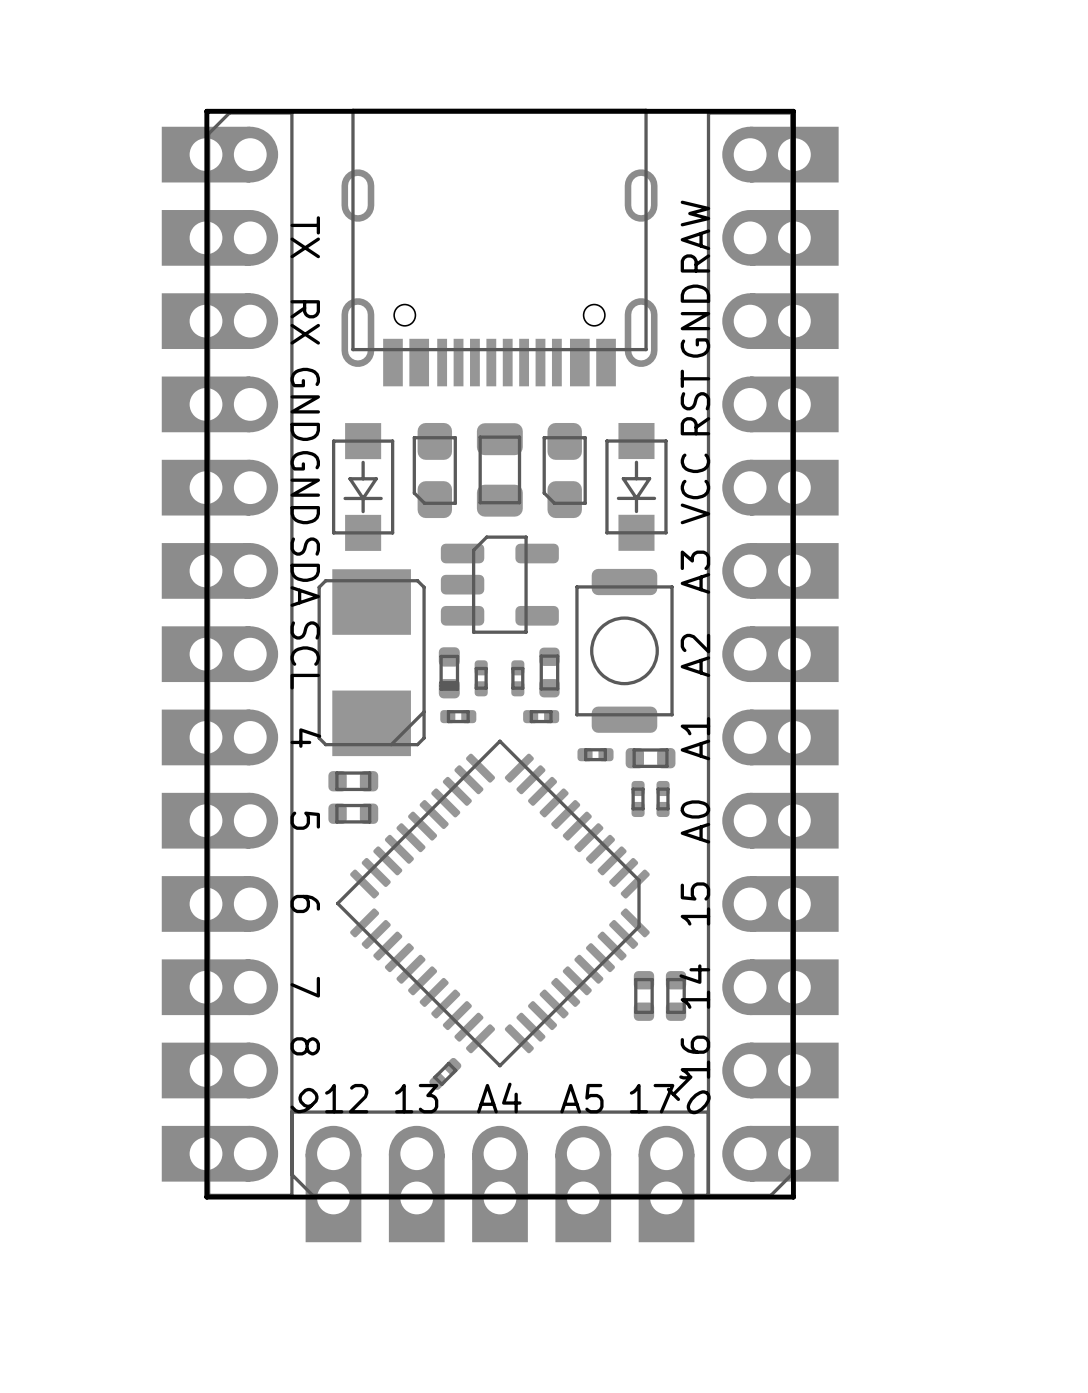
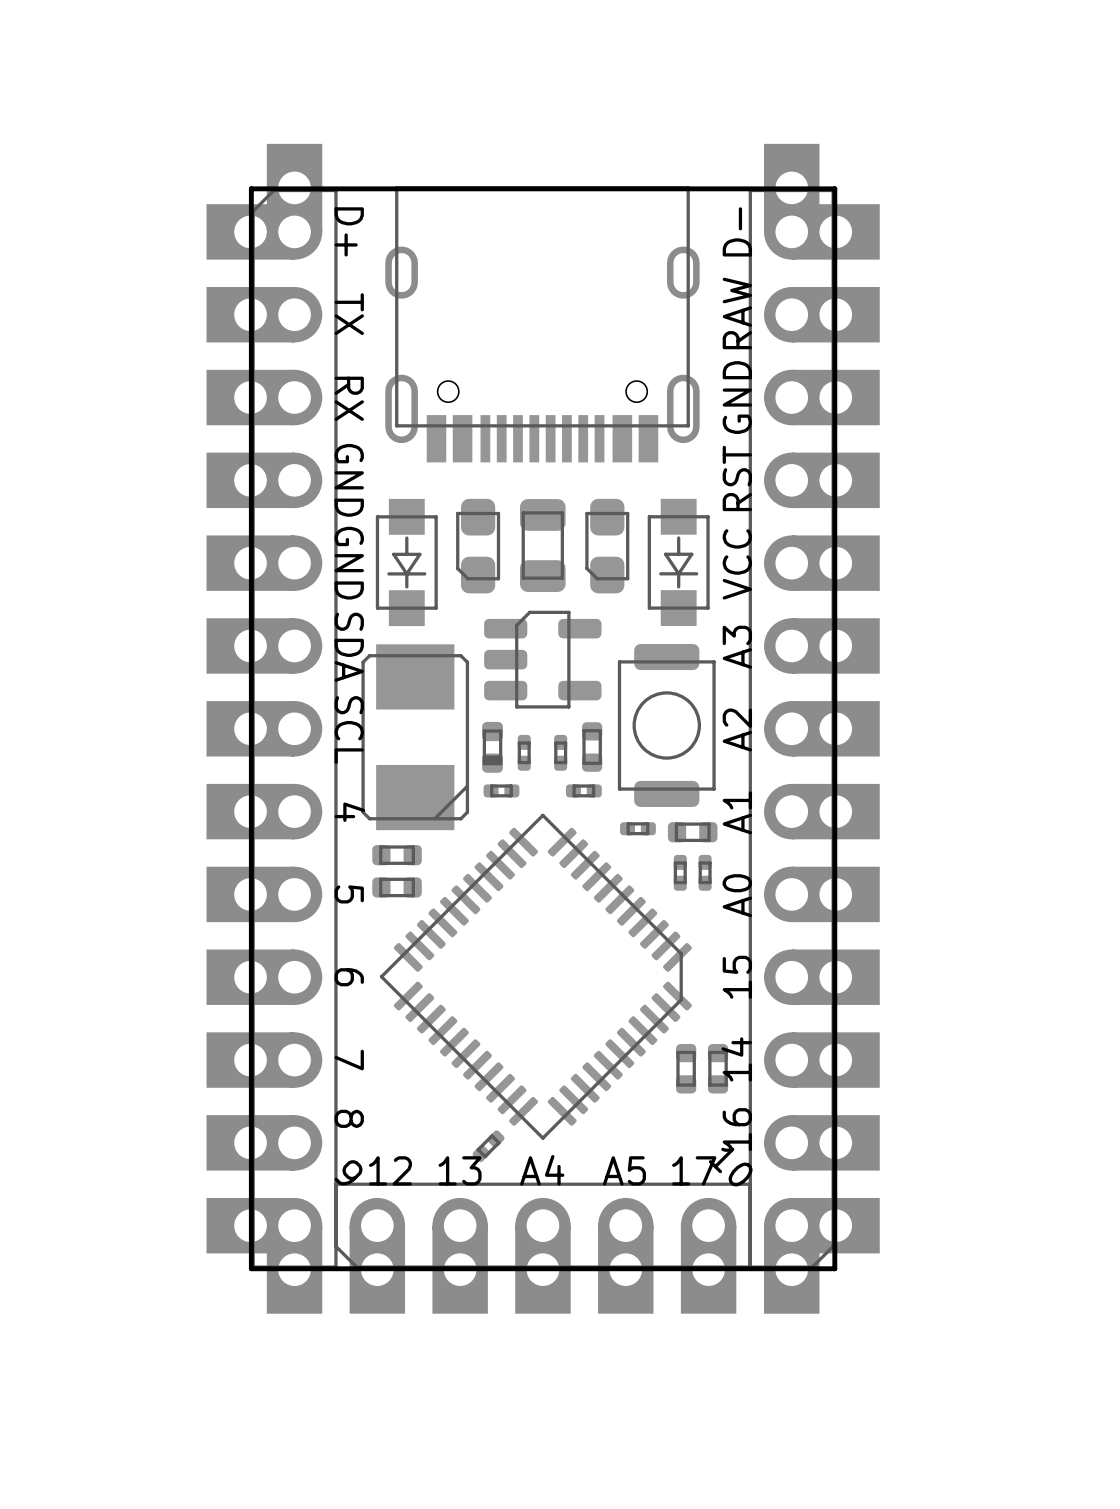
part footprint: [161, 111, 294, 1198] -> [206, 143, 338, 1314]
part footprint: [706, 111, 839, 1198] -> [748, 143, 880, 1314]
text: none -> D+ (349, 231)
text: none -> D- (737, 231)

